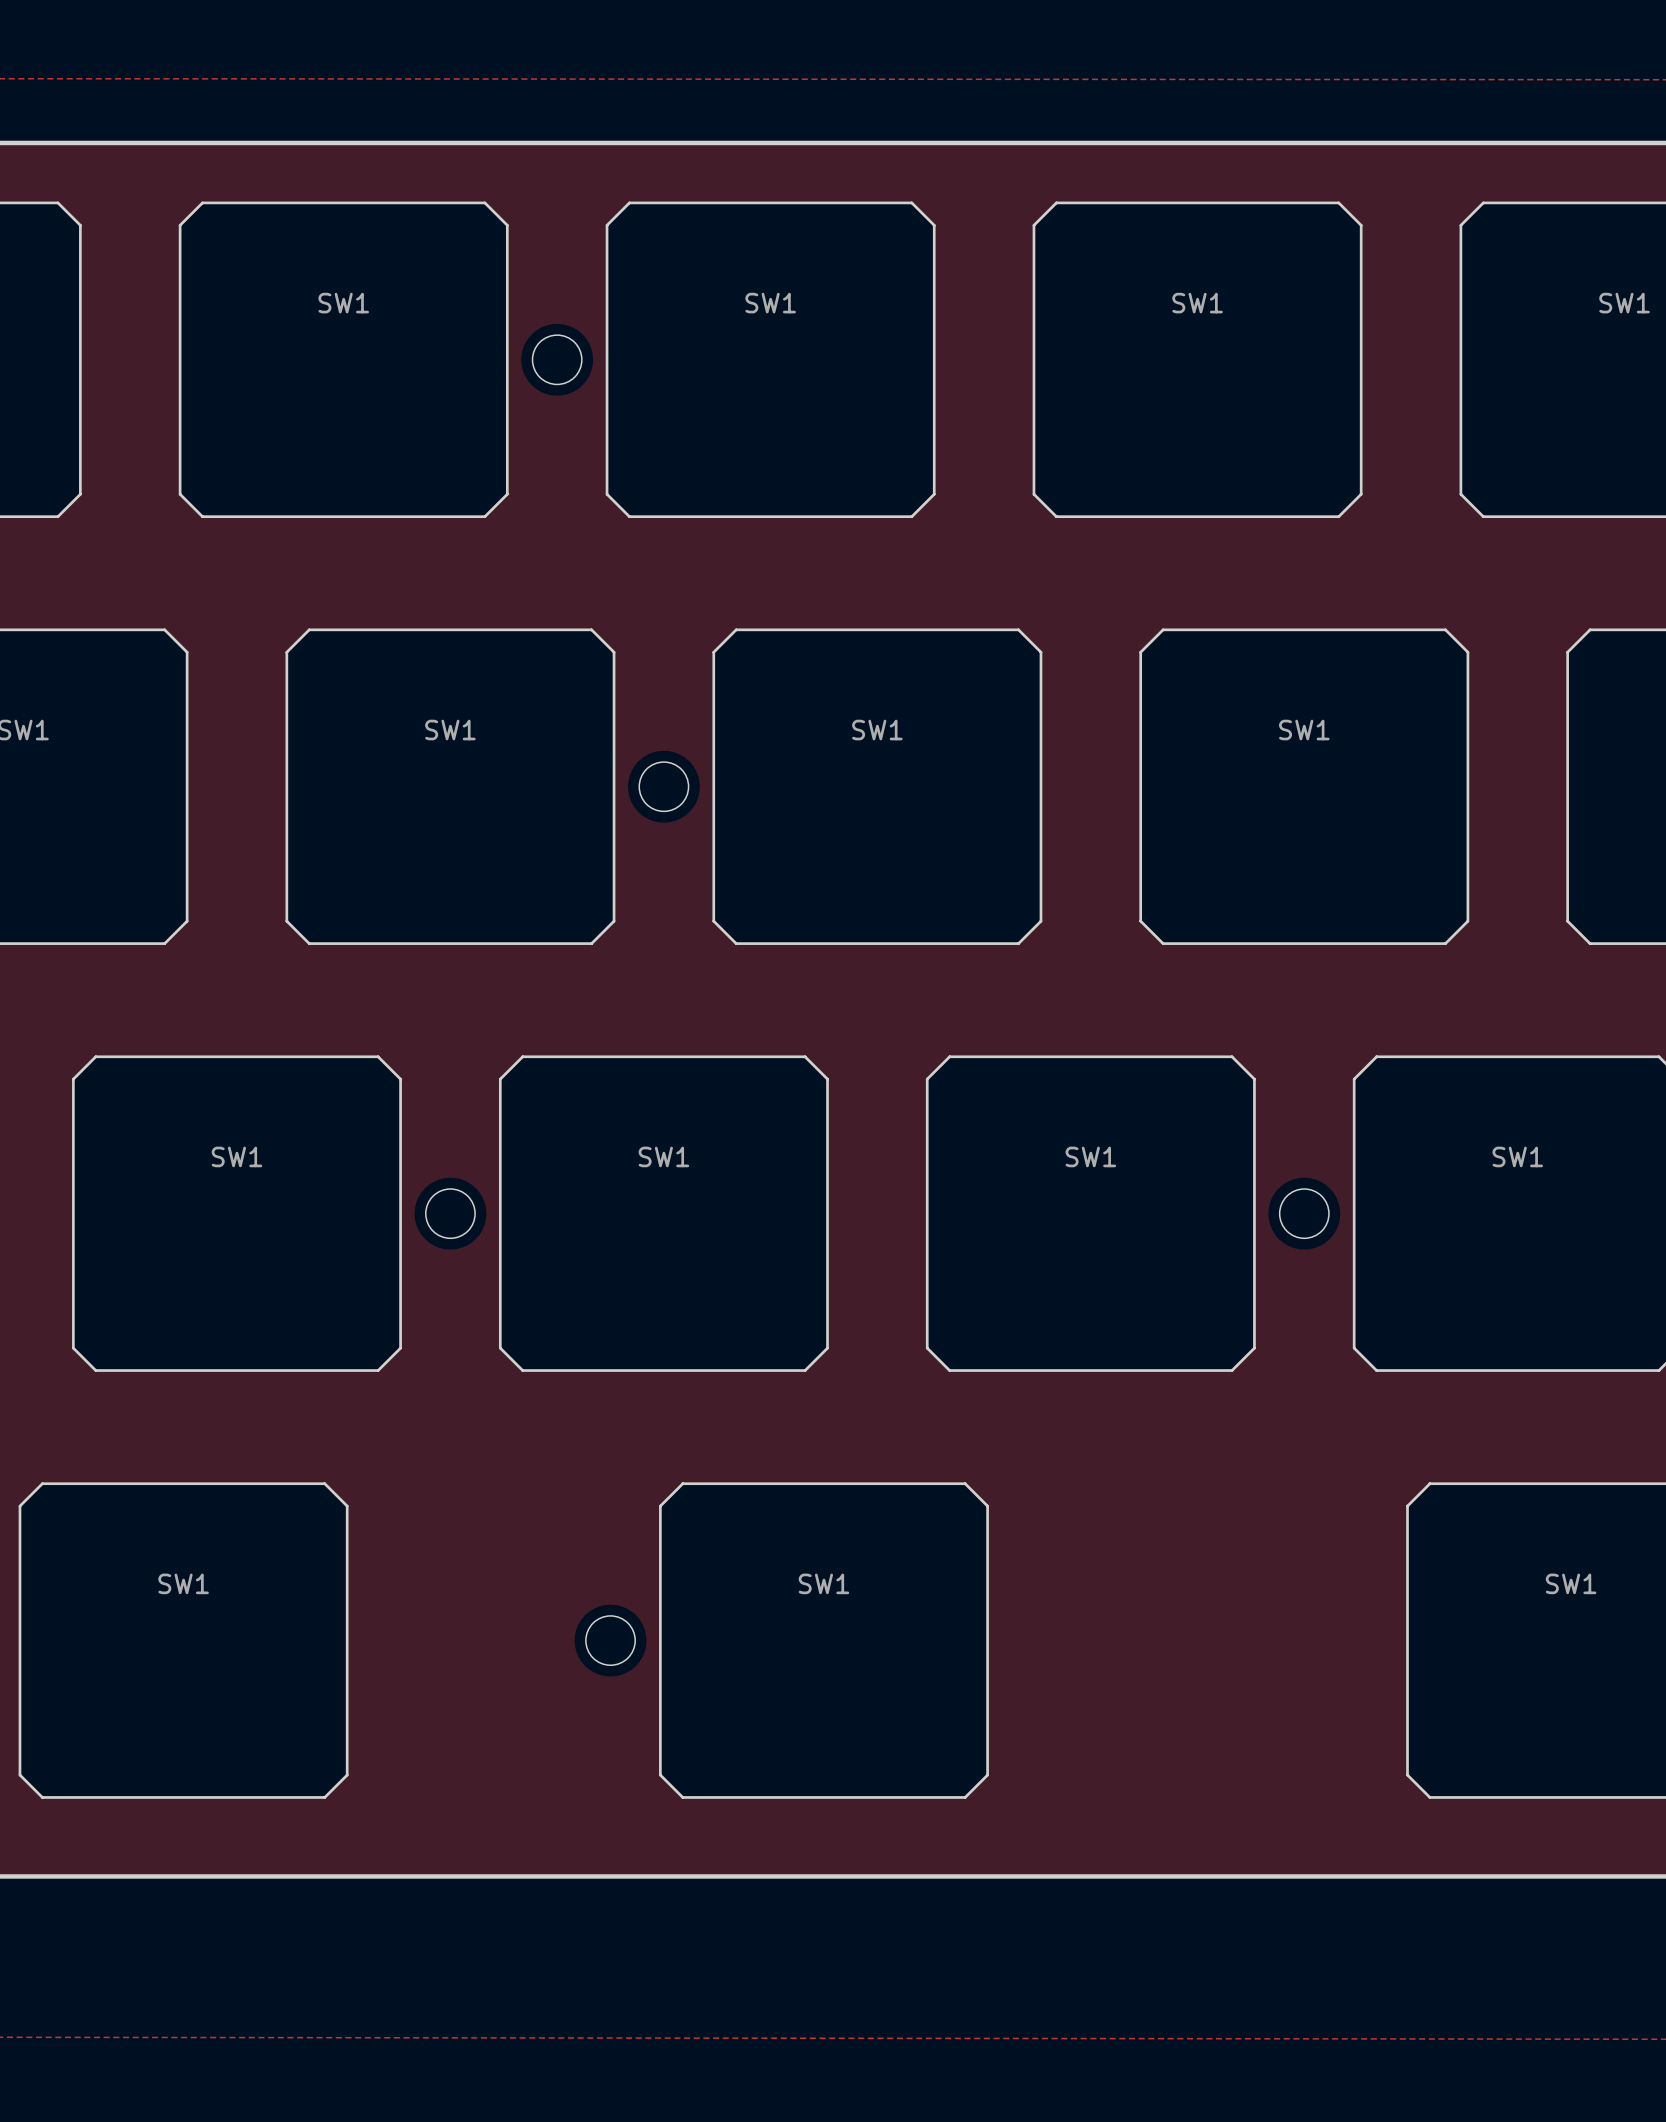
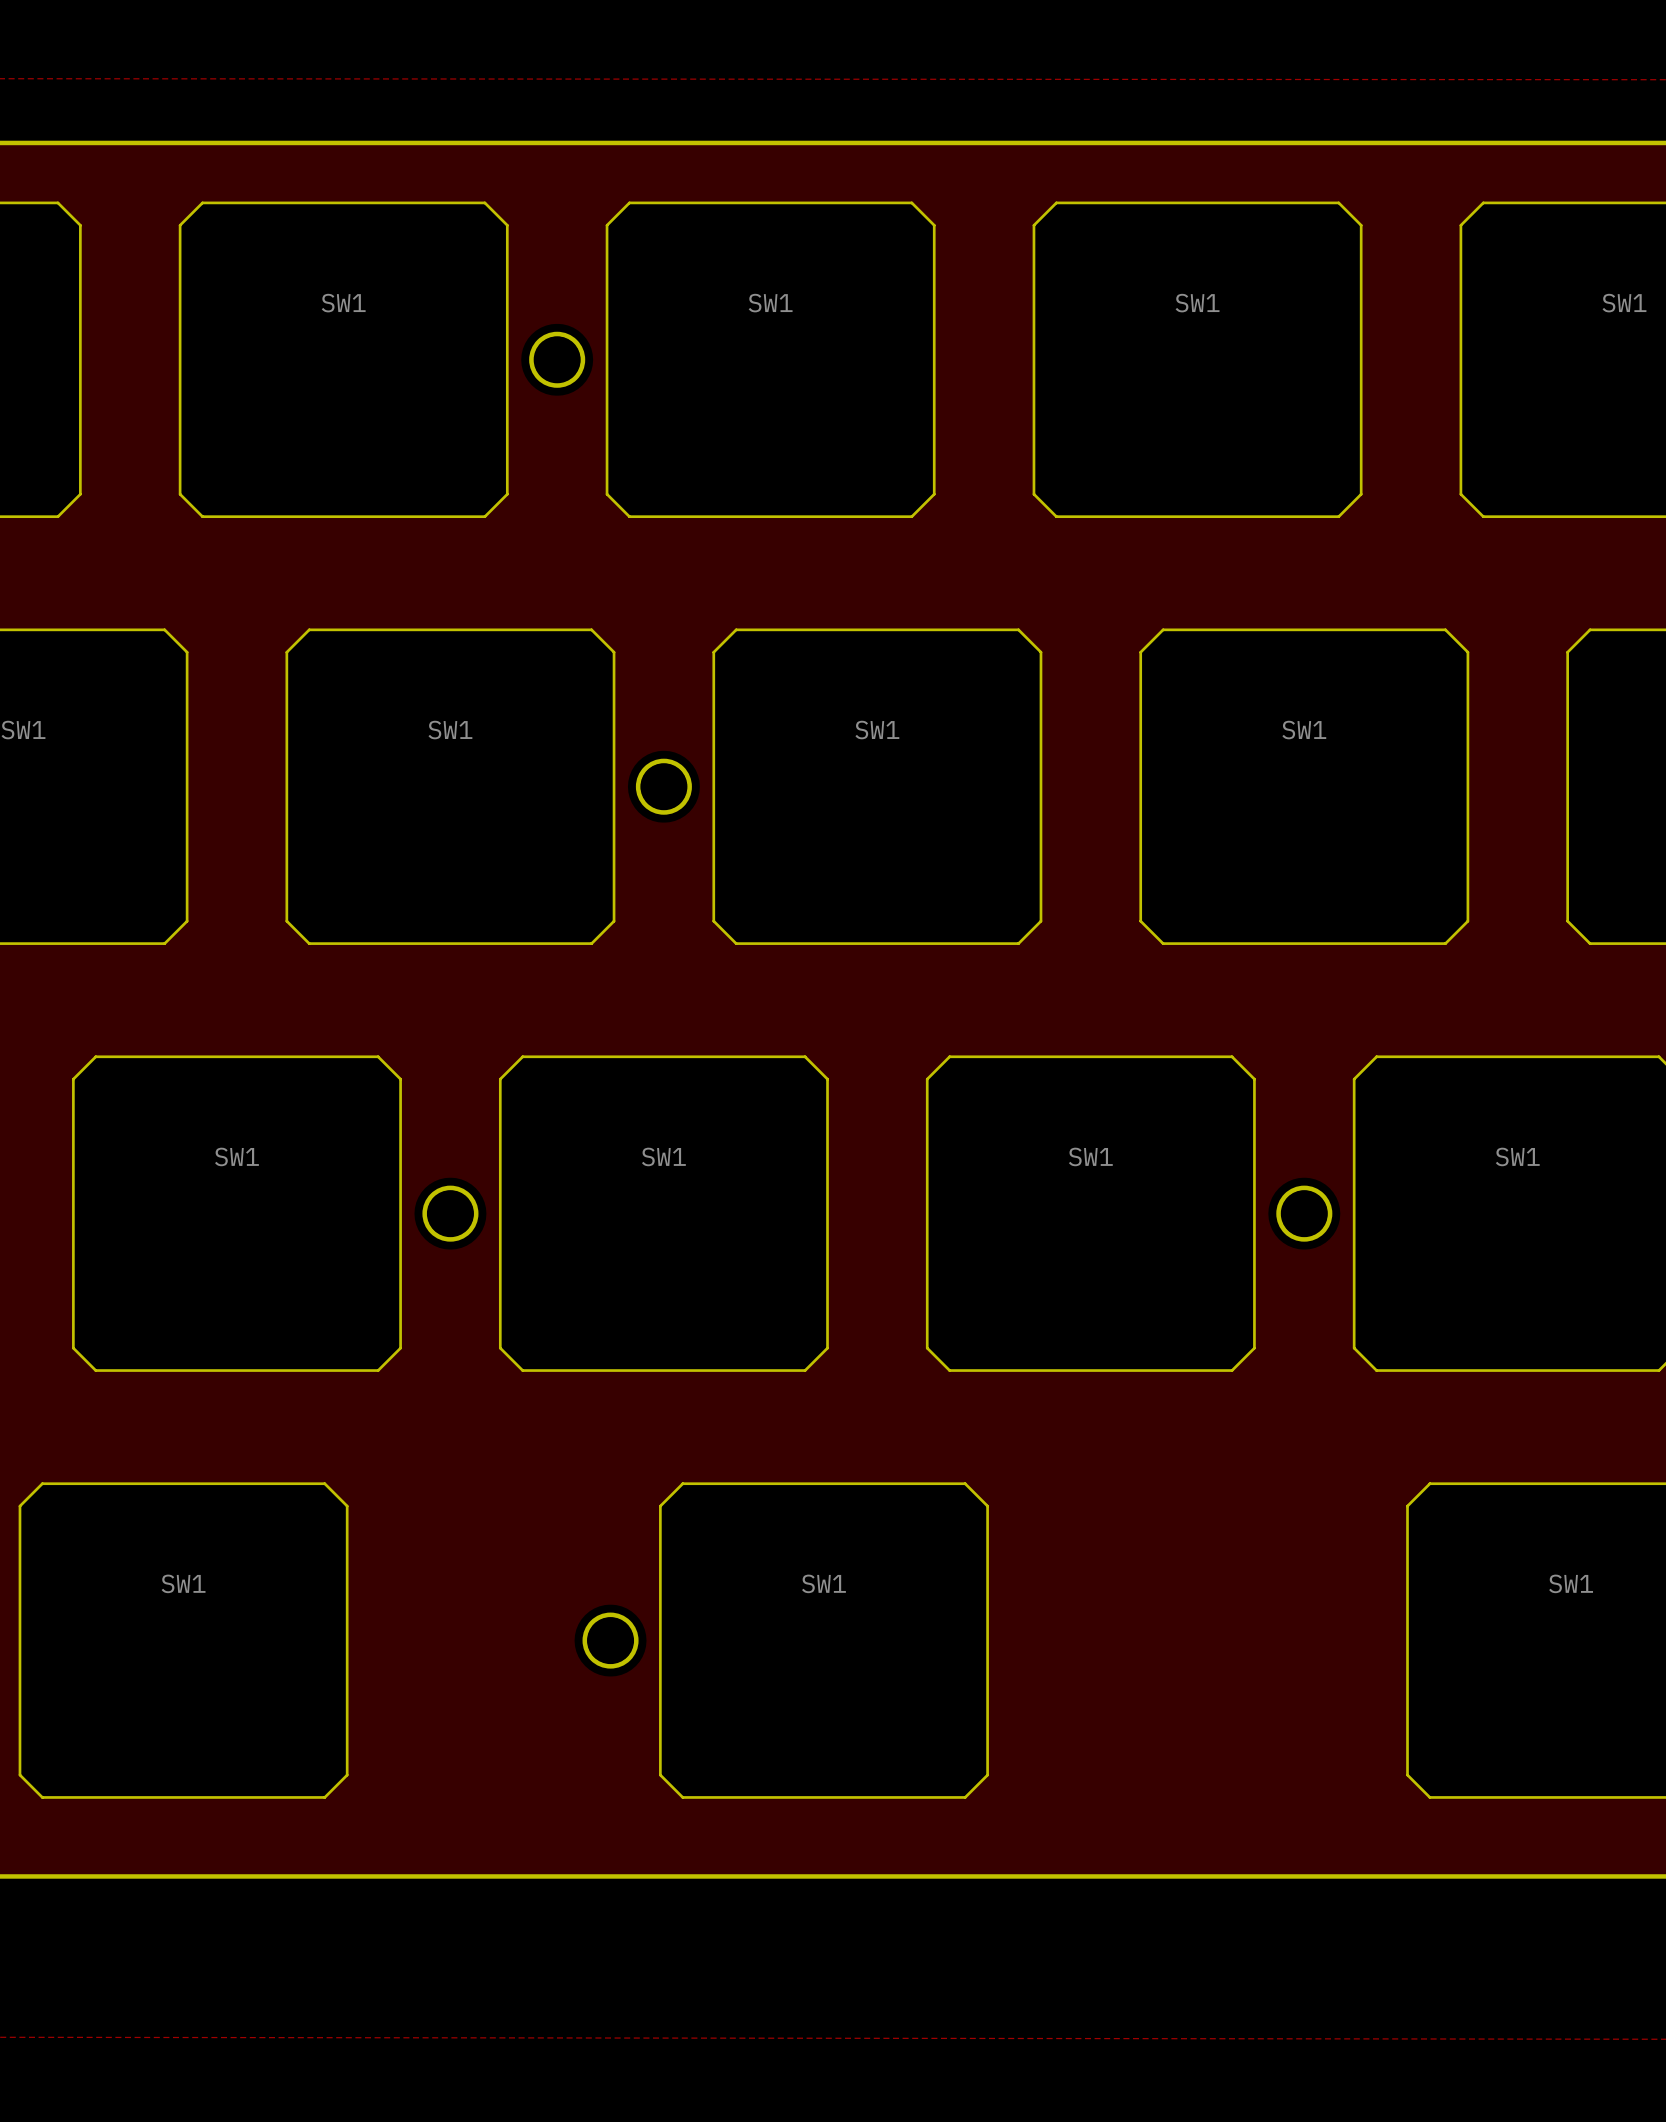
round board edge: none -> [529, 331, 586, 388]
round board edge: none -> [635, 758, 692, 815]
round board edge: none -> [422, 1185, 479, 1242]
round board edge: none -> [1276, 1185, 1333, 1242]
round board edge: none -> [582, 1612, 639, 1669]

